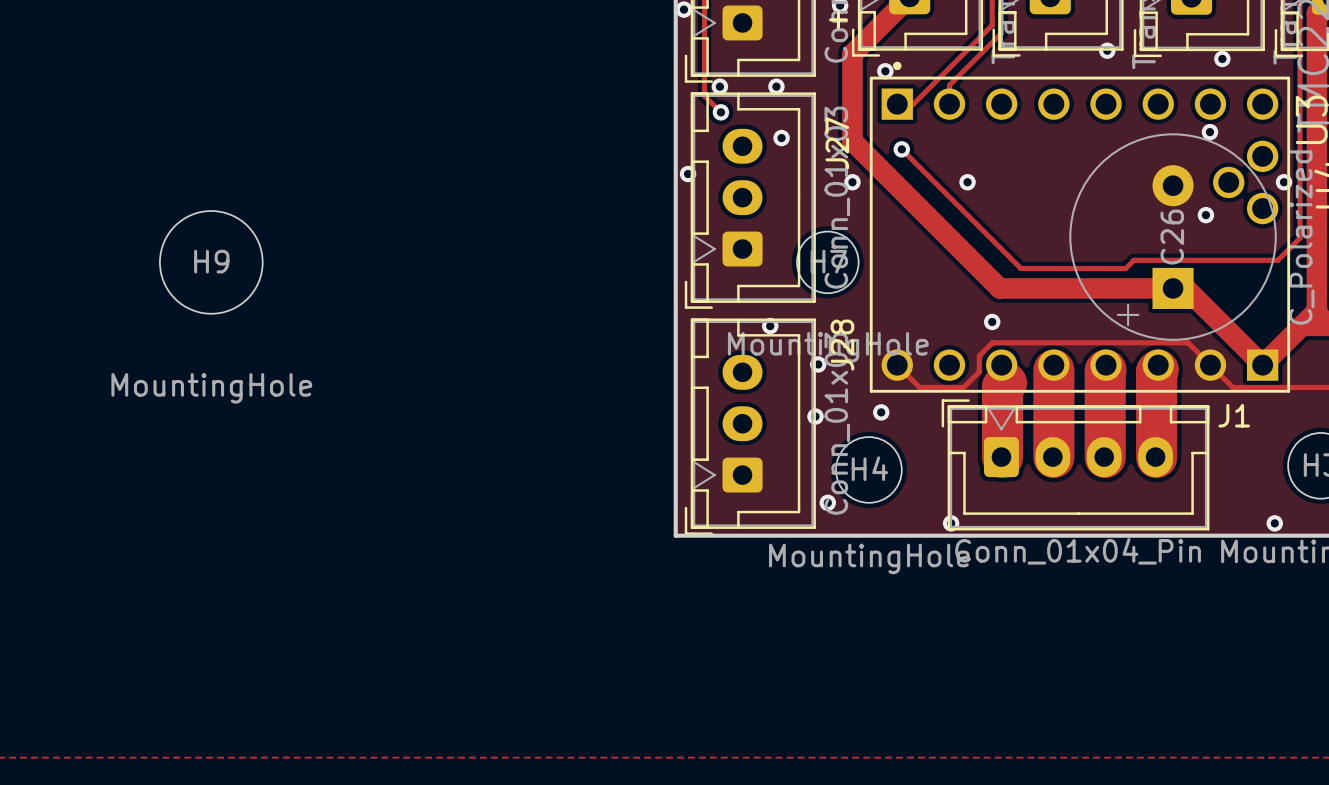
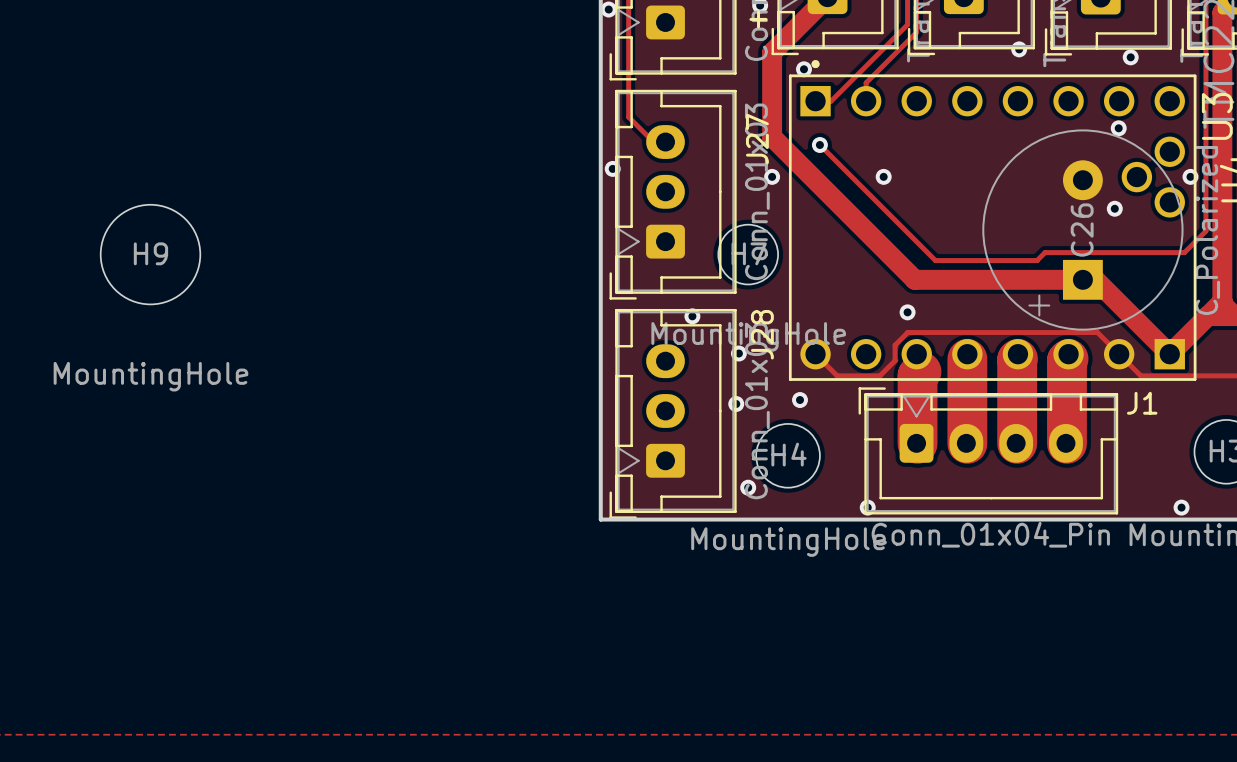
via: (719, 86) -> none
via: (776, 86) -> none
track: (704, 95) (720, 112) -> (628, 93) (628, 117) (656, 145)
via: (720, 112) -> none
via: (781, 138) -> none

